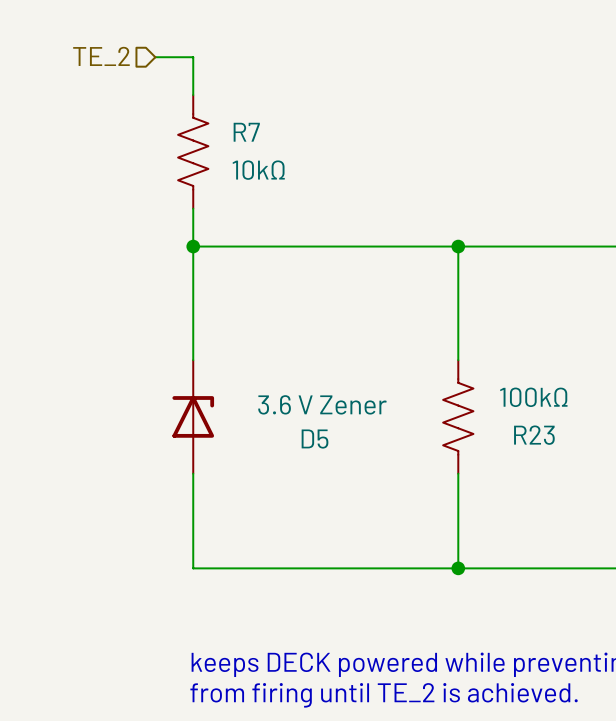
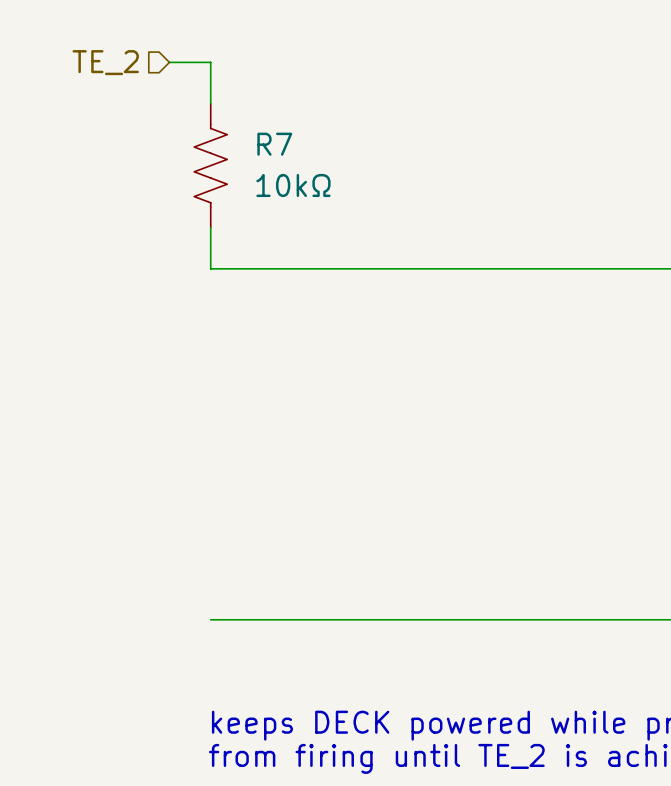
wire: (193, 246) (193, 360) -> none
junction: (193, 246) -> none
wire: (458, 246) (458, 360) -> none
junction: (458, 246) -> none
D5: 3.6 V Zener (193, 416) -> none
R23: 100kΩ (458, 416) -> none
wire: (193, 473) (193, 568) -> none
wire: (458, 473) (458, 568) -> none
junction: (458, 568) -> none

